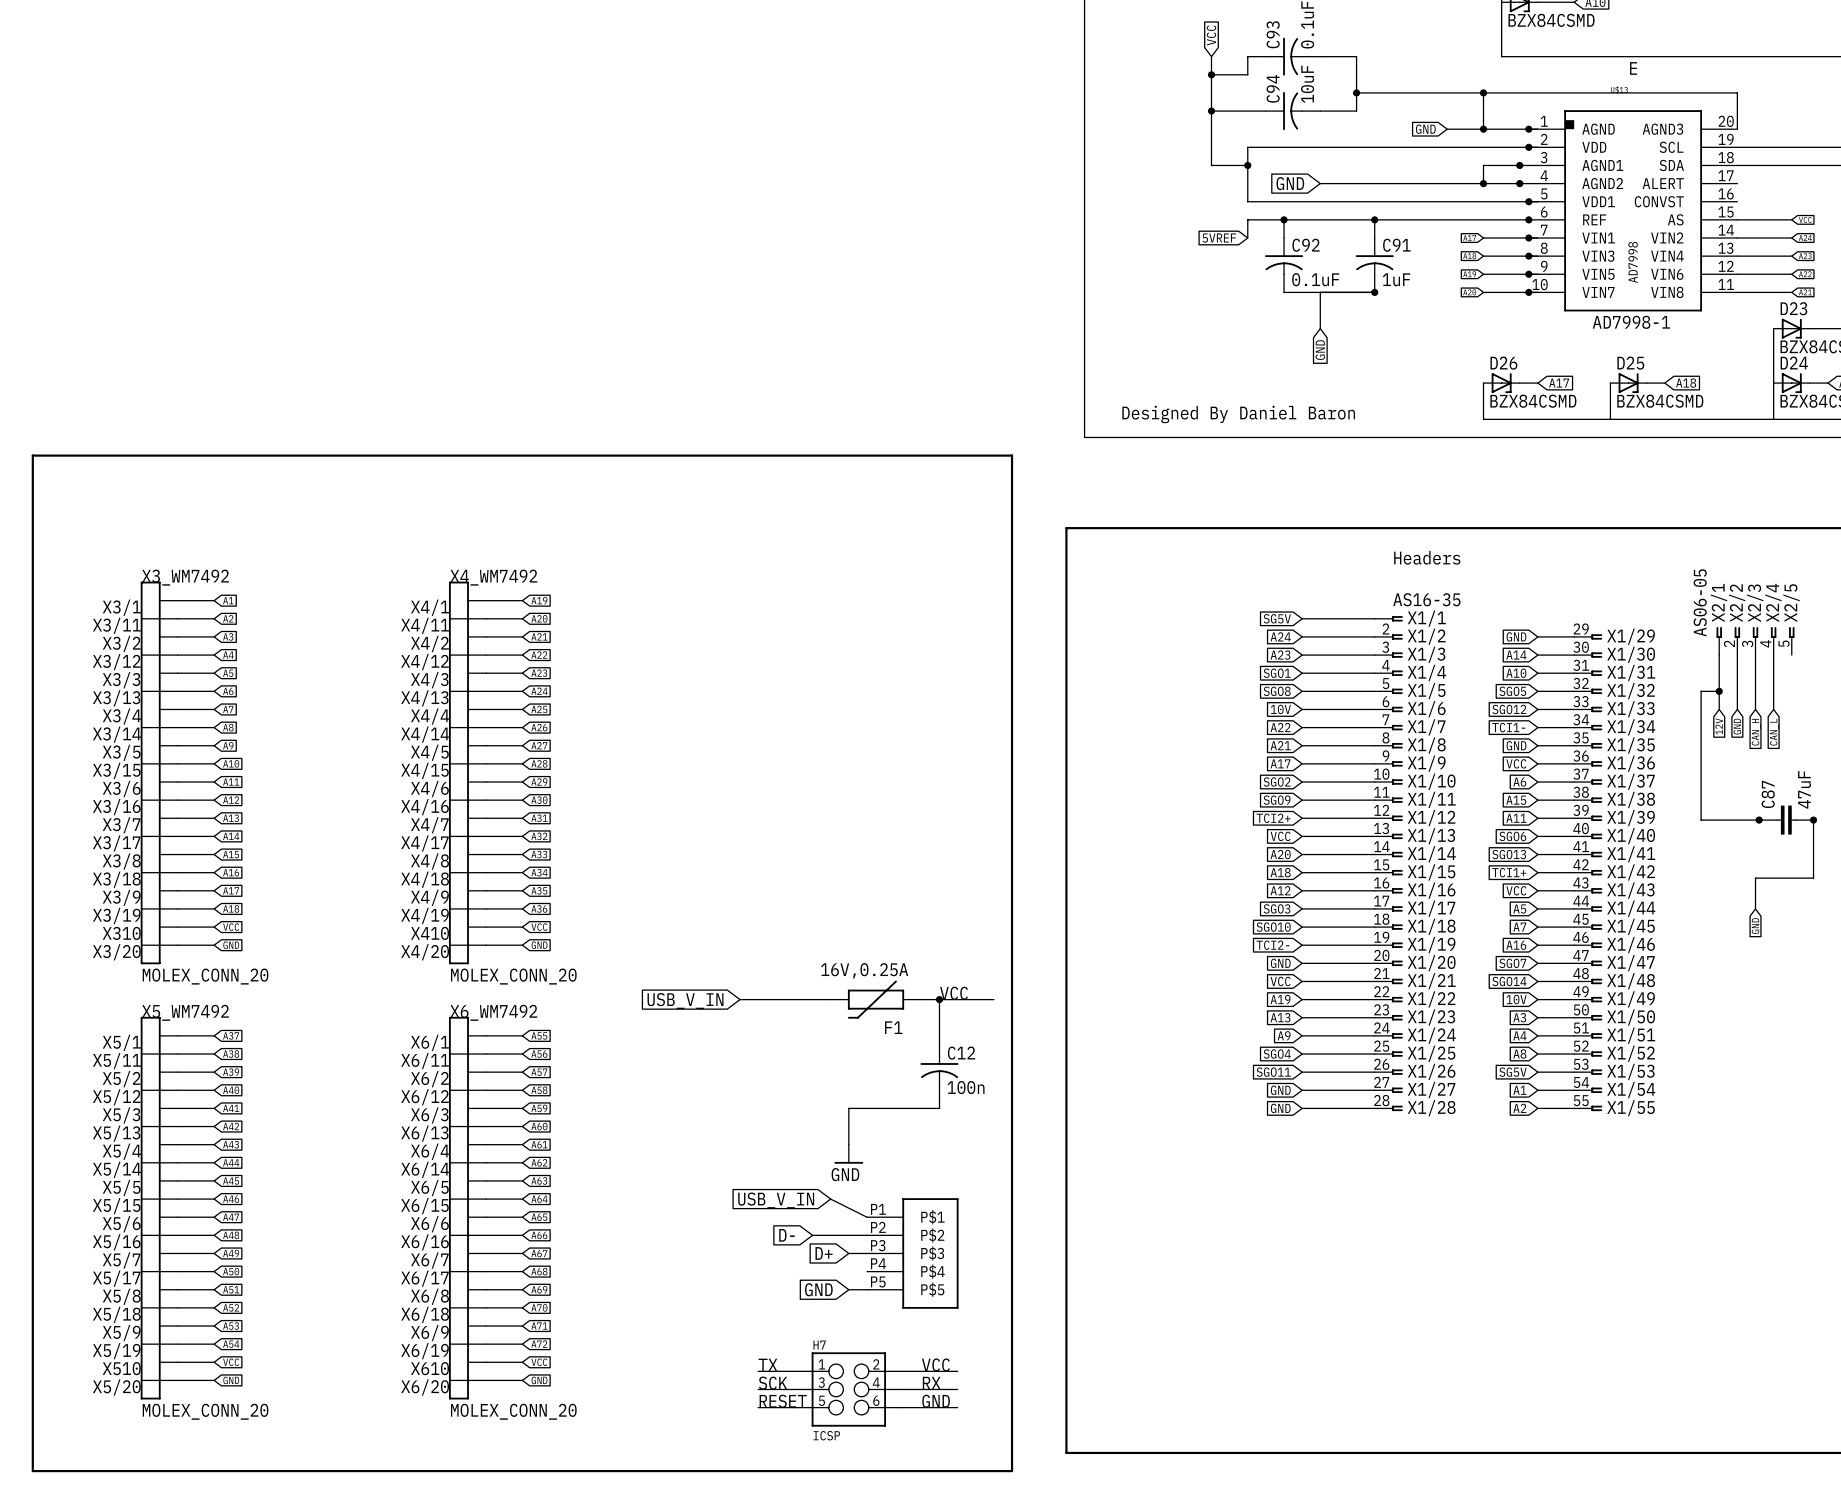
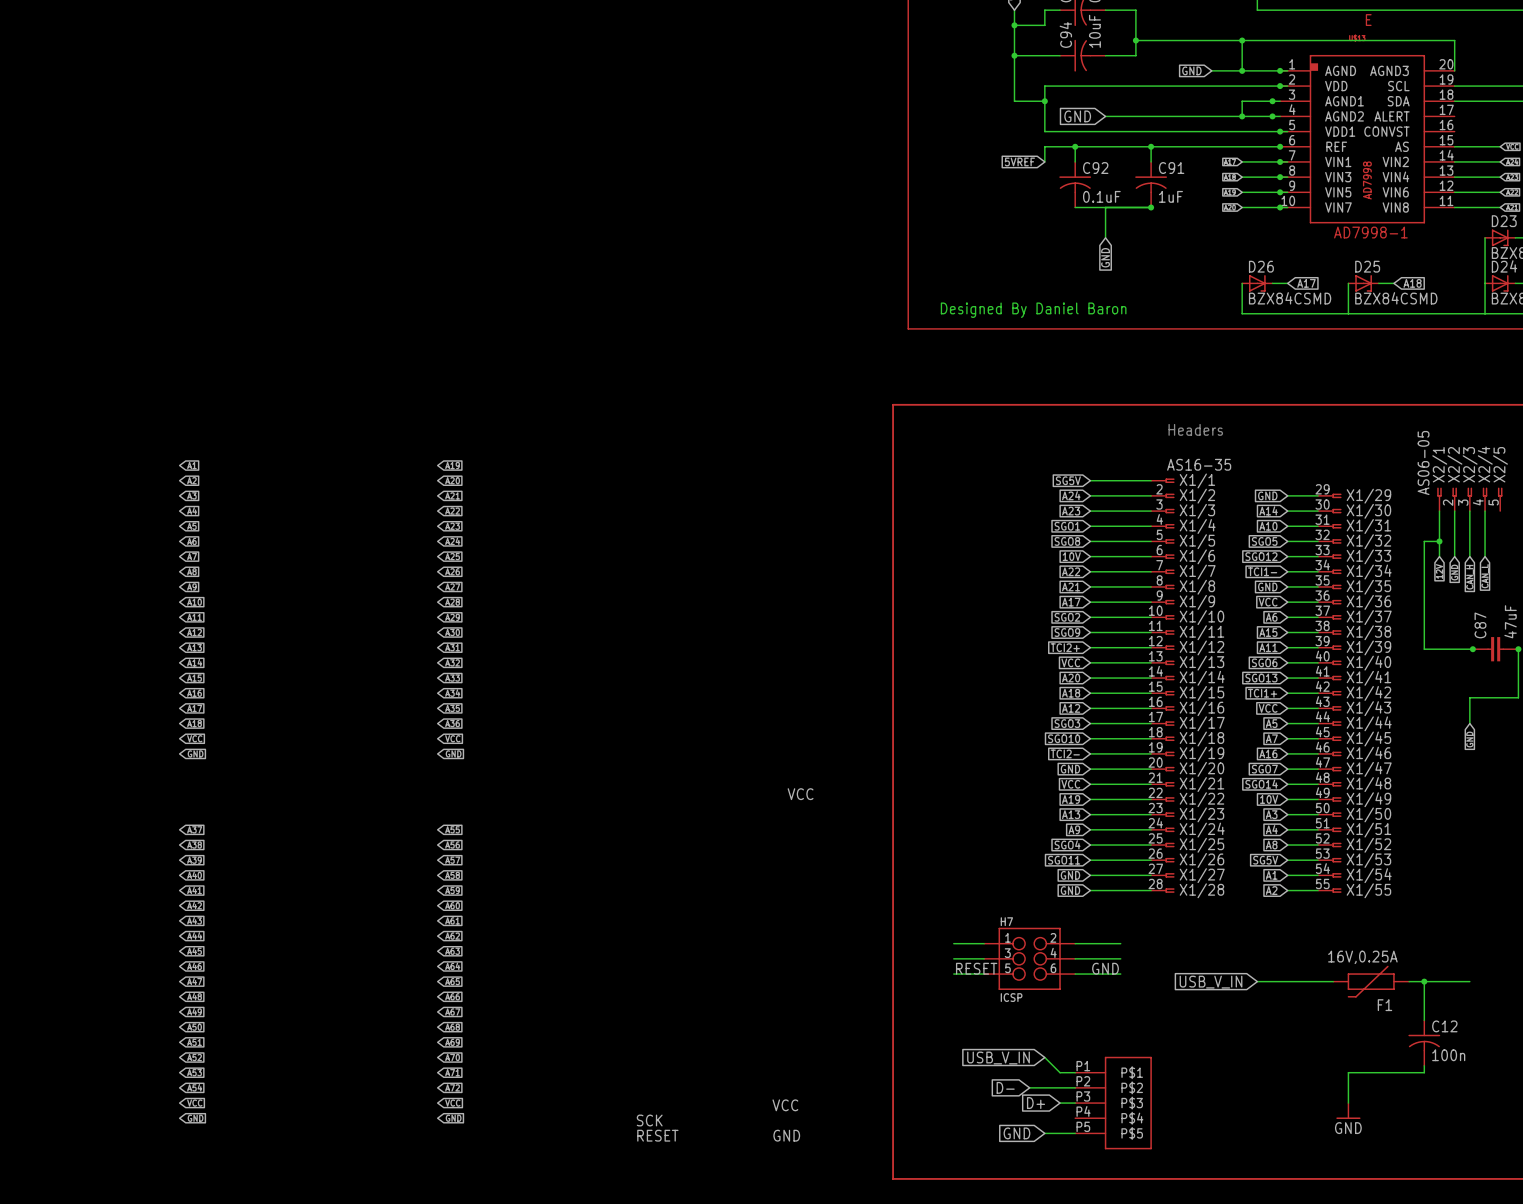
line: (32, 455) (1012, 455) (1012, 1471) (32, 1471) (32, 455) -> none
X3/1: (168, 600) -> none
wire: (177, 600) (214, 600) -> none
X4/1: (477, 600) -> none
wire: (486, 600) (522, 600) -> none
X3/11: (159, 618) -> none
wire: (177, 618) (214, 618) -> none
X4/11: (468, 618) -> none
wire: (486, 618) (522, 618) -> none
X3/2: (168, 636) -> none
wire: (177, 636) (214, 636) -> none
X4/2: (477, 636) -> none
wire: (486, 636) (522, 636) -> none
X3/12: (159, 655) -> none
wire: (177, 655) (214, 655) -> none
X4/12: (468, 655) -> none
wire: (486, 655) (522, 655) -> none
X3/3: (168, 673) -> none
wire: (177, 673) (214, 673) -> none
X4/3: (477, 673) -> none
wire: (486, 673) (522, 673) -> none
X3/13: (159, 691) -> none
wire: (177, 691) (214, 691) -> none
X4/13: (468, 691) -> none
wire: (486, 691) (522, 691) -> none
X3/4: (168, 709) -> none
wire: (177, 709) (214, 709) -> none
X4/4: (477, 709) -> none
wire: (486, 709) (522, 709) -> none
X3/14: (159, 727) -> none
wire: (177, 727) (214, 727) -> none
X4/14: (468, 727) -> none
wire: (486, 727) (522, 727) -> none
X3/5: (168, 745) -> none
wire: (177, 745) (214, 745) -> none
X4/5: (477, 745) -> none
wire: (486, 745) (522, 745) -> none
X3/15: (159, 763) -> none
wire: (177, 763) (214, 763) -> none
X4/15: (468, 763) -> none
wire: (486, 763) (522, 763) -> none
X3_WM7492: MOLEX_CONN_20 (150, 772) -> none
X4_WM7492: MOLEX_CONN_20 (458, 772) -> none
X3/6: (168, 782) -> none
wire: (177, 782) (214, 782) -> none
X4/6: (477, 782) -> none
wire: (486, 782) (522, 782) -> none
X3/16: (159, 800) -> none
wire: (177, 800) (214, 800) -> none
X4/16: (468, 800) -> none
wire: (486, 800) (522, 800) -> none
X3/7: (168, 818) -> none
wire: (177, 818) (214, 818) -> none
X4/7: (477, 818) -> none
wire: (486, 818) (522, 818) -> none
X3/17: (159, 836) -> none
wire: (177, 836) (214, 836) -> none
X4/17: (468, 836) -> none
wire: (486, 836) (522, 836) -> none
X3/8: (168, 854) -> none
wire: (177, 854) (214, 854) -> none
X4/8: (477, 854) -> none
wire: (486, 854) (522, 854) -> none
X3/18: (159, 872) -> none
wire: (177, 872) (214, 872) -> none
X4/18: (468, 872) -> none
wire: (486, 872) (522, 872) -> none
X3/9: (168, 890) -> none
wire: (177, 890) (214, 890) -> none
X4/9: (477, 890) -> none
wire: (486, 890) (522, 890) -> none
X3/19: (159, 908) -> none
wire: (177, 908) (214, 908) -> none
X4/19: (468, 908) -> none
wire: (486, 908) (522, 908) -> none
X310: (168, 927) -> none
wire: (177, 927) (214, 927) -> none
X410: (477, 927) -> none
wire: (486, 927) (522, 927) -> none
X3/20: (159, 945) -> none
wire: (177, 945) (214, 945) -> none
X4/20: (468, 945) -> none
wire: (486, 945) (522, 945) -> none
wire: (740, 999) (830, 999) -> none
F1 position: (876, 999) -> (1371, 981)
wire: (921, 999) (993, 999) -> none
wire: (939, 999) (939, 1045) -> none
junction: (939, 999) -> none
global label: USB_V_IN (685, 1001) -> none
X5/1: (168, 1035) -> none
wire: (177, 1035) (214, 1035) -> none
X6/1: (477, 1035) -> none
wire: (486, 1035) (522, 1035) -> none
X5/11: (159, 1054) -> none
wire: (177, 1054) (214, 1054) -> none
X6/11: (468, 1054) -> none
wire: (486, 1054) (522, 1054) -> none
X5/2: (168, 1072) -> none
wire: (177, 1072) (214, 1072) -> none
X6/2: (477, 1072) -> none
wire: (486, 1072) (522, 1072) -> none
C12 position: (939, 1073) -> (1424, 1043)
X5/12: (159, 1090) -> none
wire: (177, 1090) (214, 1090) -> none
X6/12: (468, 1090) -> none
wire: (486, 1090) (522, 1090) -> none
wire: (939, 1100) (939, 1108) (848, 1108) (848, 1144) -> none
X5/3: (168, 1108) -> none
wire: (177, 1108) (214, 1108) -> none
X6/3: (477, 1108) -> none
wire: (486, 1108) (522, 1108) -> none
X5/13: (159, 1126) -> none
wire: (177, 1126) (214, 1126) -> none
X6/13: (468, 1126) -> none
wire: (486, 1126) (522, 1126) -> none
X5/4: (168, 1144) -> none
wire: (177, 1144) (214, 1144) -> none
X6/4: (477, 1144) -> none
wire: (486, 1144) (522, 1144) -> none
power symbol: GND (848, 1154) -> none
X5/14: (159, 1162) -> none
wire: (177, 1162) (214, 1162) -> none
X6/14: (468, 1162) -> none
wire: (486, 1162) (522, 1162) -> none
wire: none -> (953, 943) (984, 943)
wire: none -> (1075, 943) (1120, 943)
X5/5: (168, 1180) -> none
wire: (177, 1180) (214, 1180) -> none
X6/5: (477, 1180) -> none
wire: (486, 1180) (522, 1180) -> none
wire: none -> (953, 958) (984, 958)
wire: none -> (1075, 958) (1120, 958)
X5/15: (159, 1199) -> none
wire: (177, 1199) (214, 1199) -> none
X6/15: (468, 1199) -> none
wire: (486, 1199) (522, 1199) -> none
wire: (830, 1199) (866, 1217) -> none
global label: USB_V_IN (776, 1200) -> none
label: none -> RESET (976, 968)
label: none -> GND (1105, 968)
X5_WM7492: MOLEX_CONN_20 (150, 1208) -> none
X6_WM7492: MOLEX_CONN_20 (458, 1208) -> none
wire: none -> (953, 974) (984, 974)
wire: none -> (1075, 974) (1120, 974)
X5/6: (168, 1217) -> none
wire: (177, 1217) (214, 1217) -> none
X6/6: (477, 1217) -> none
wire: (486, 1217) (522, 1217) -> none
wire: none -> (1257, 981) (1333, 981)
wire: none -> (1409, 981) (1469, 981)
wire: none -> (1424, 981) (1424, 1020)
junction: none -> (1424, 981)
global label: none -> USB_V_IN (1211, 982)
X5/16: (159, 1235) -> none
wire: (177, 1235) (214, 1235) -> none
X6/16: (468, 1235) -> none
wire: (486, 1235) (522, 1235) -> none
global label: D- (787, 1235) -> none
wire: (812, 1235) (866, 1235) -> none
X5/7: (168, 1253) -> none
wire: (177, 1253) (214, 1253) -> none
X6/7: (477, 1253) -> none
wire: (486, 1253) (522, 1253) -> none
global label: D+ (824, 1253) -> none
wire: (848, 1253) (866, 1253) -> none
part: (912, 1253) -> none
X5/17: (159, 1271) -> none
wire: (177, 1271) (214, 1271) -> none
X6/17: (468, 1271) -> none
wire: (486, 1271) (522, 1271) -> none
X5/8: (168, 1289) -> none
wire: (177, 1289) (214, 1289) -> none
X6/8: (477, 1289) -> none
wire: (486, 1289) (522, 1289) -> none
global label: GND (818, 1289) -> none
wire: (848, 1289) (866, 1289) -> none
X5/18: (159, 1307) -> none
wire: (177, 1307) (214, 1307) -> none
X6/18: (468, 1307) -> none
wire: (486, 1307) (522, 1307) -> none
wire: none -> (1044, 1057) (1060, 1072) (1075, 1072)
global label: none -> USB_V_IN (998, 1058)
wire: none -> (1424, 1065) (1424, 1072) (1348, 1072) (1348, 1103)
X5/9: (168, 1326) -> none
wire: (177, 1326) (214, 1326) -> none
X6/9: (477, 1326) -> none
wire: (486, 1326) (522, 1326) -> none
X5/19: (159, 1344) -> none
wire: (177, 1344) (214, 1344) -> none
X6/19: (468, 1344) -> none
wire: (486, 1344) (522, 1344) -> none
global label: none -> D- (1005, 1087)
wire: none -> (1029, 1087) (1075, 1087)
X510: (168, 1362) -> none
wire: (177, 1362) (214, 1362) -> none
X610: (477, 1362) -> none
wire: (486, 1362) (522, 1362) -> none
global label: none -> D+ (1036, 1103)
wire: none -> (1060, 1103) (1075, 1103)
part: none -> (1113, 1103)
label: TX (767, 1365) -> none
wire: (758, 1371) (794, 1371) -> none
wire: (903, 1371) (957, 1371) -> none
power symbol: none -> GND (1348, 1111)
X5/20: (159, 1380) -> none
wire: (177, 1380) (214, 1380) -> none
X6/20: (468, 1380) -> none
wire: (486, 1380) (522, 1380) -> none
label: RX (931, 1383) -> none
wire: (758, 1389) (794, 1389) -> none
H7 position: (848, 1389) -> (1029, 958)
wire: (903, 1389) (957, 1389) -> none
global label: none -> GND (1016, 1133)
wire: none -> (1044, 1133) (1075, 1133)
wire: (758, 1407) (794, 1407) -> none
wire: (903, 1407) (957, 1407) -> none

